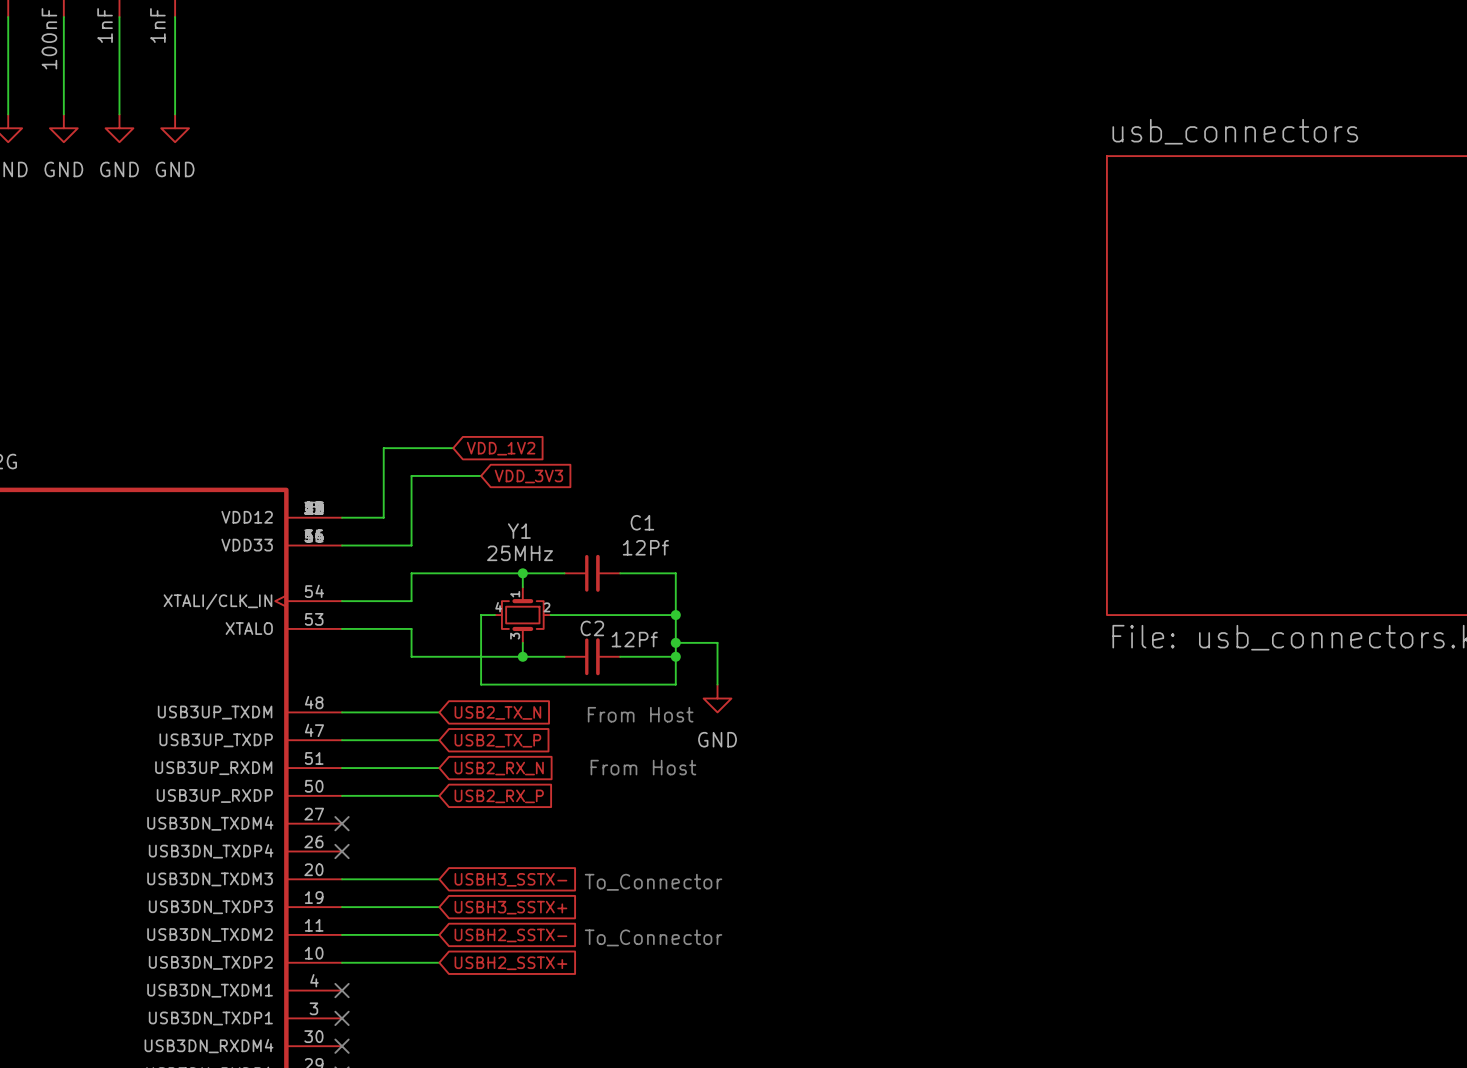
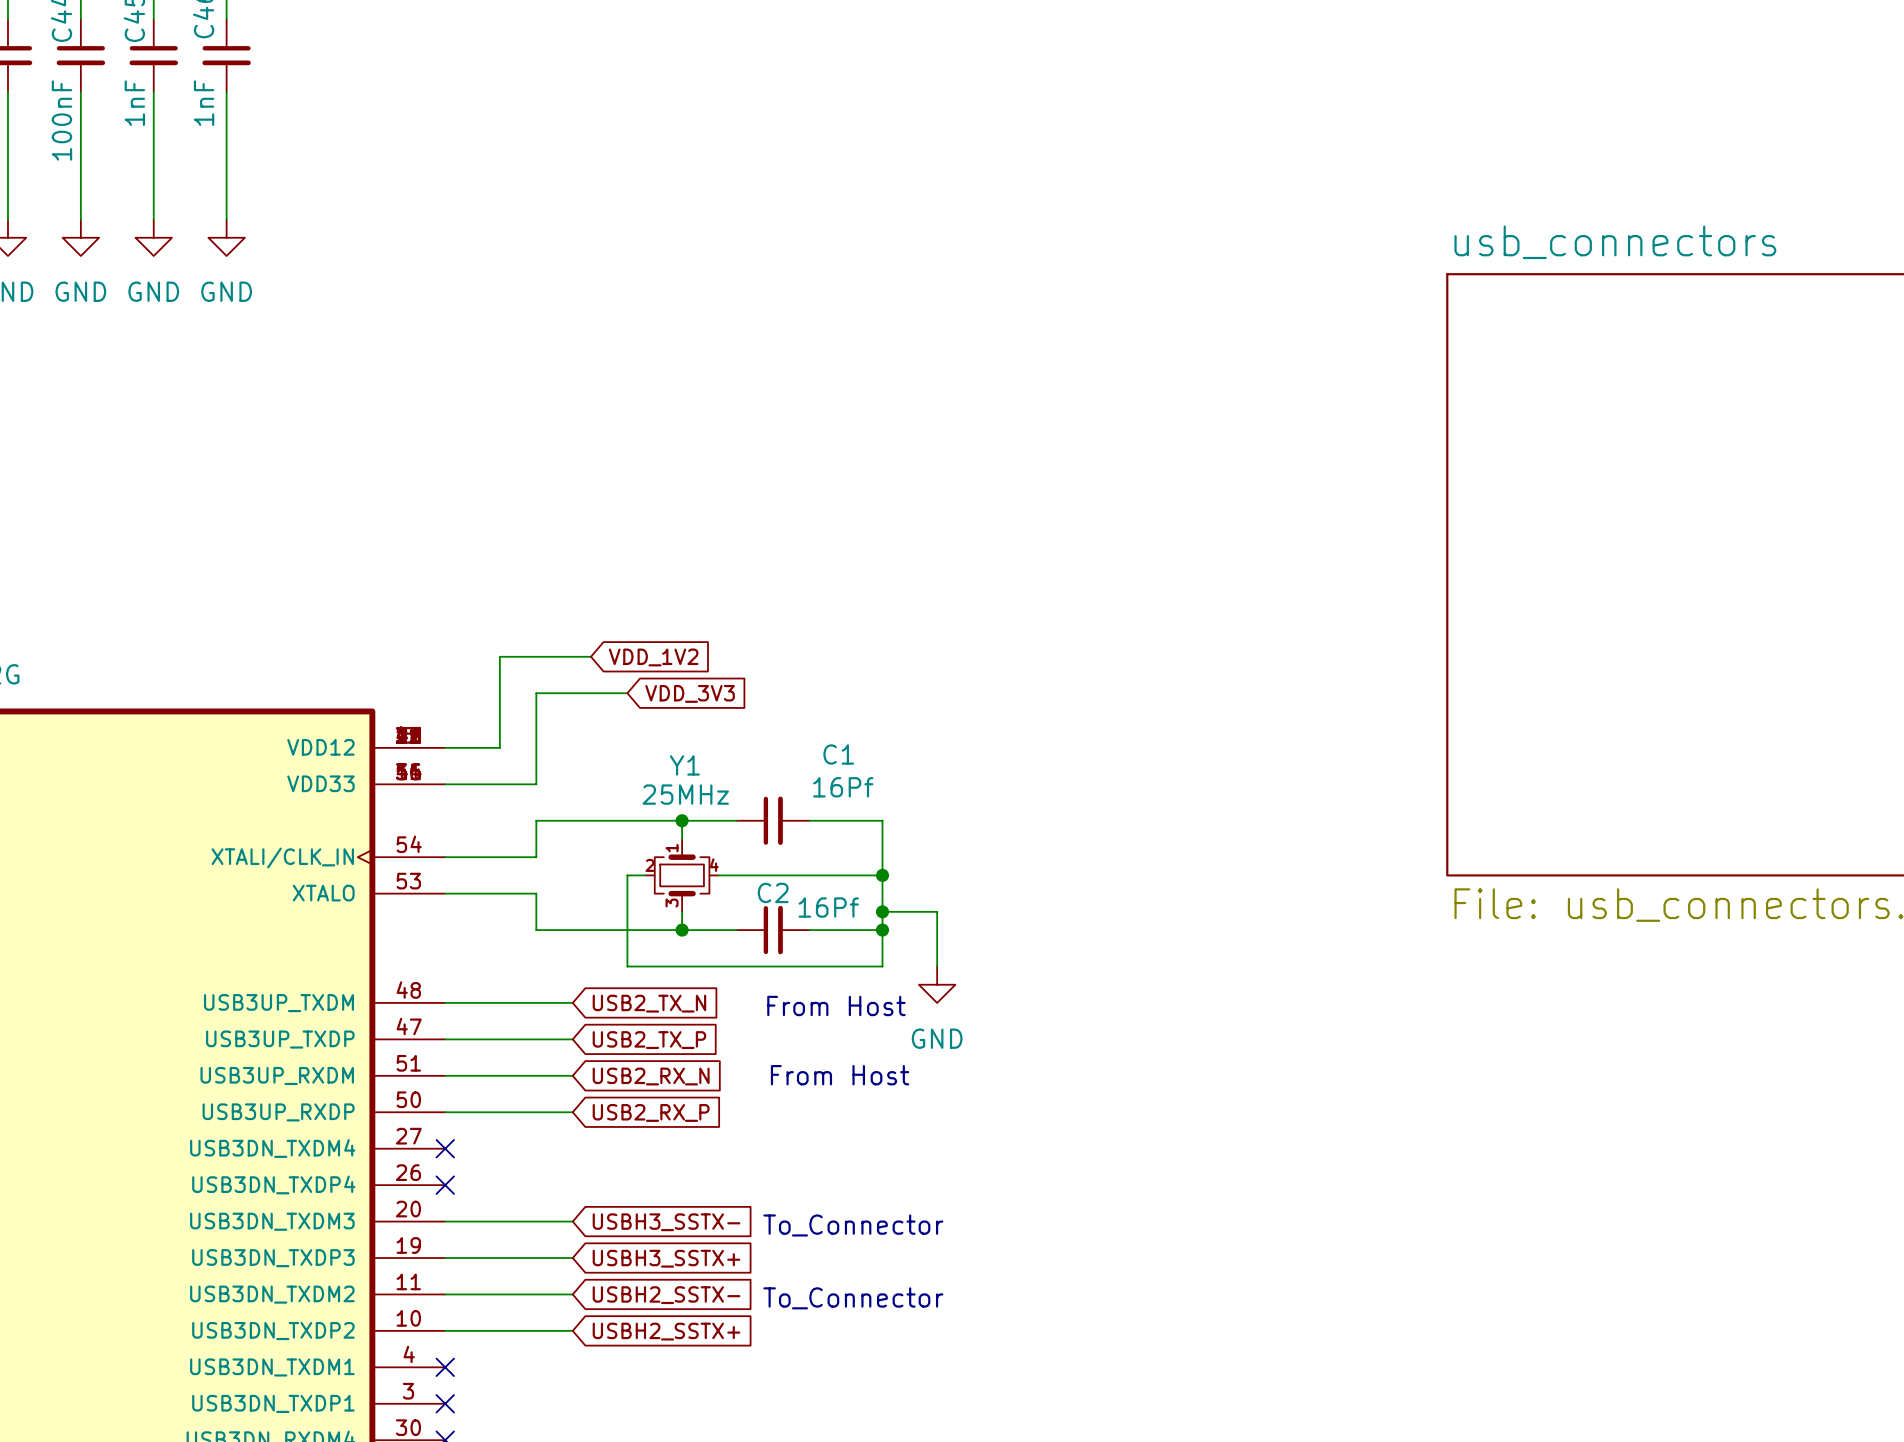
C1 value: 12Pf (645, 547) -> 16Pf (843, 787)
Y1 flip: as is (522, 615) -> left-right (682, 875)
C2 value: 12Pf (634, 639) -> 16Pf (828, 907)

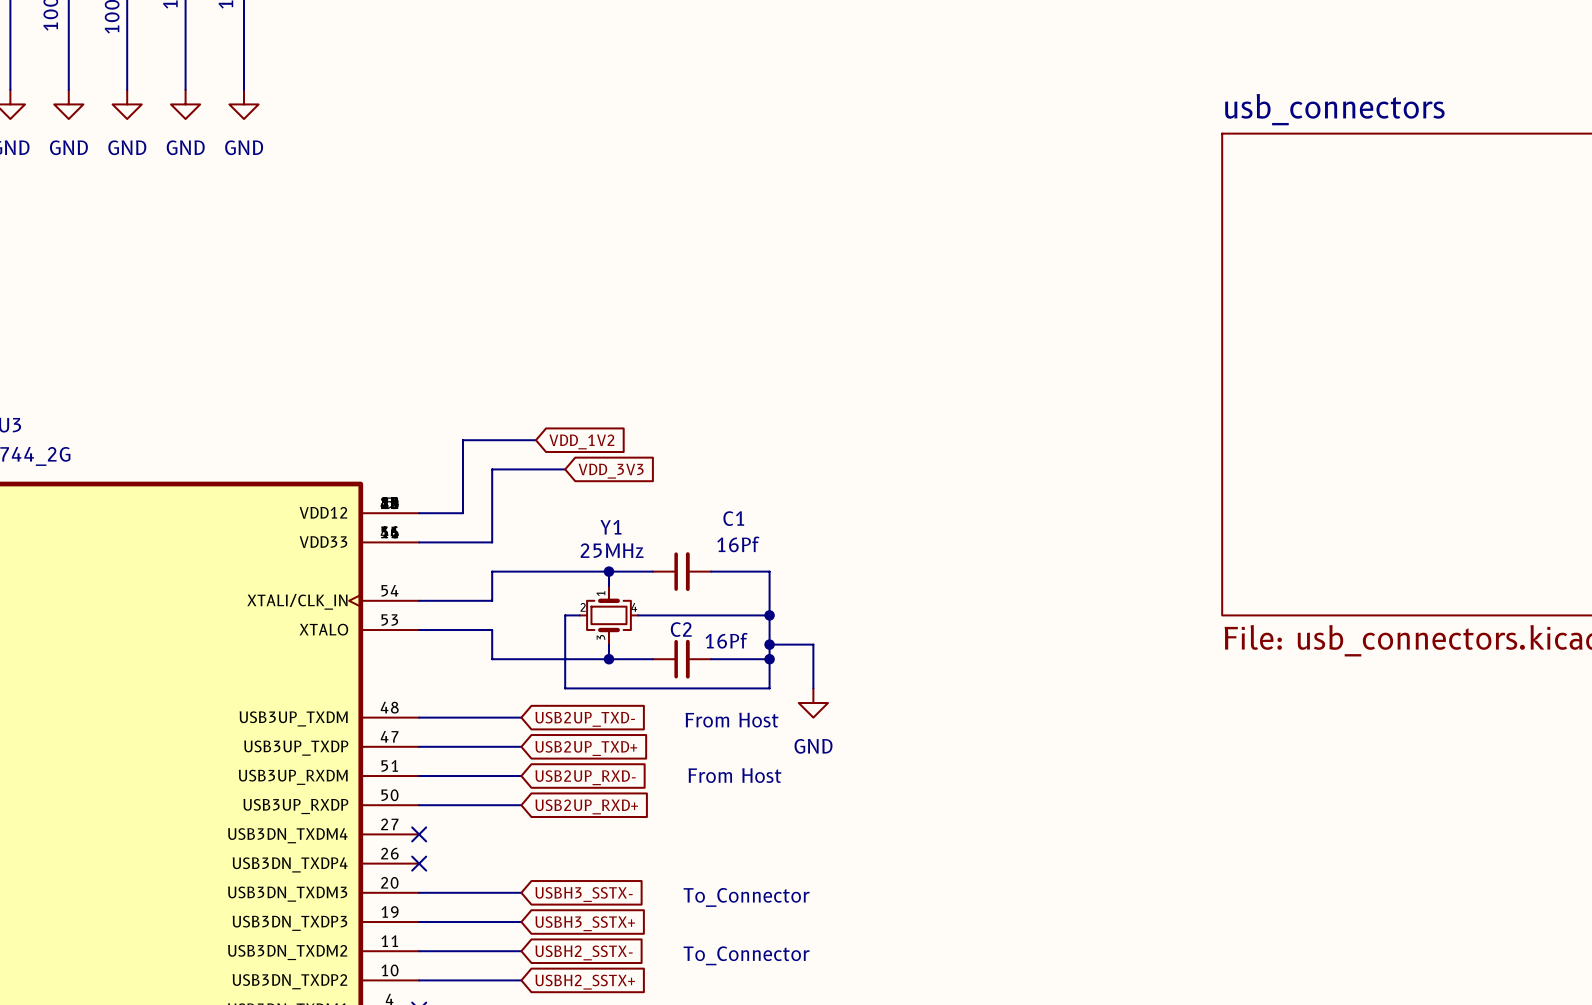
global label: USB2_TX_N (649, 1003) -> USB2UP_TXD- (585, 719)
global label: USB2_TX_P (649, 1040) -> USB2UP_TXD+ (586, 748)
global label: USB2_RX_N (651, 1076) -> USB2UP_RXD- (585, 777)
global label: USB2_RX_P (651, 1112) -> USB2UP_RXD+ (586, 806)

